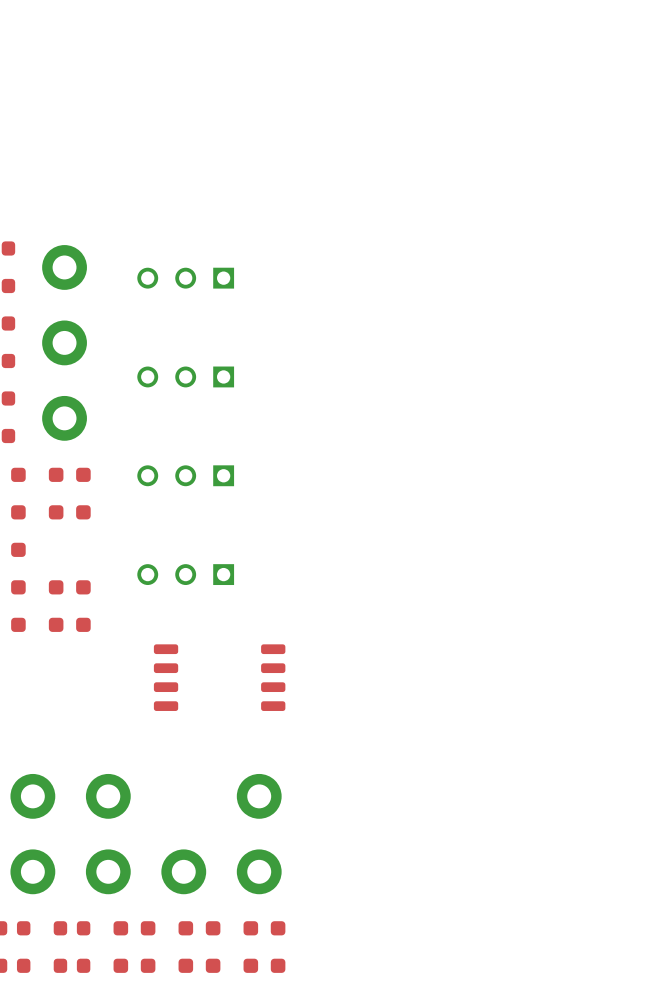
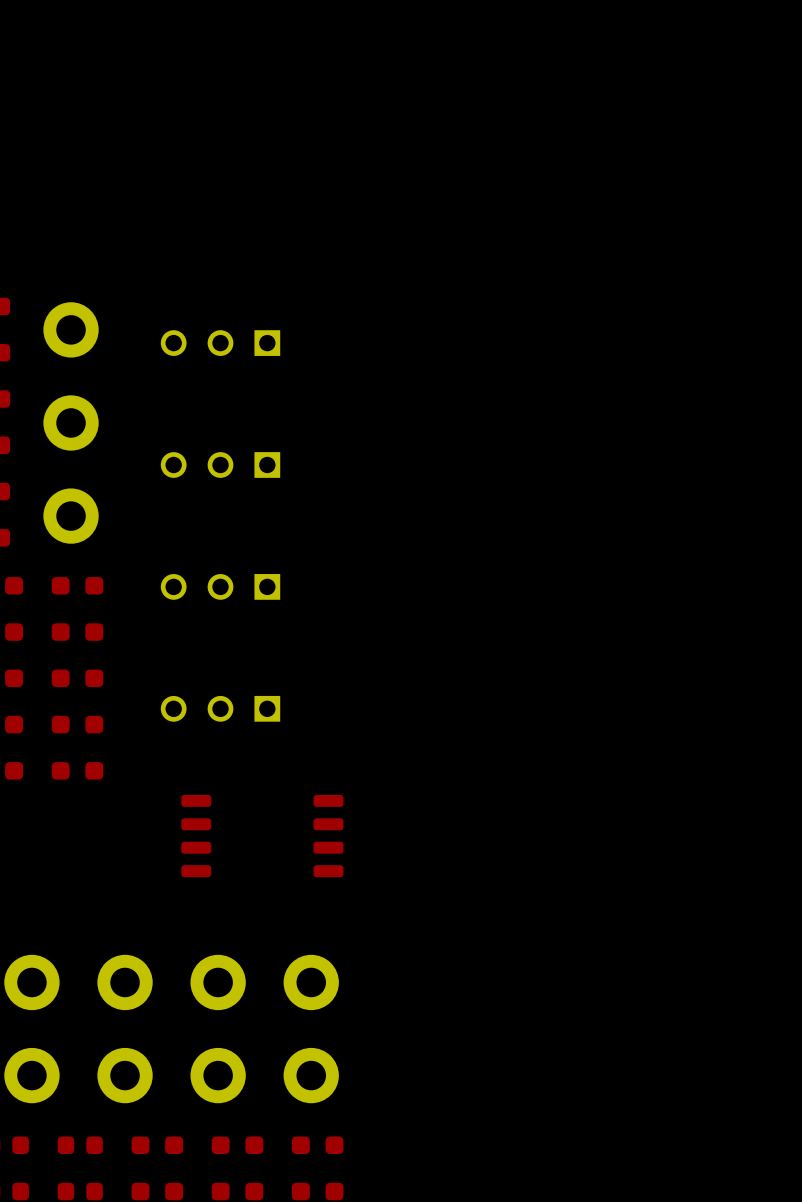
part: none -> (77, 678)
part: none -> (218, 982)

